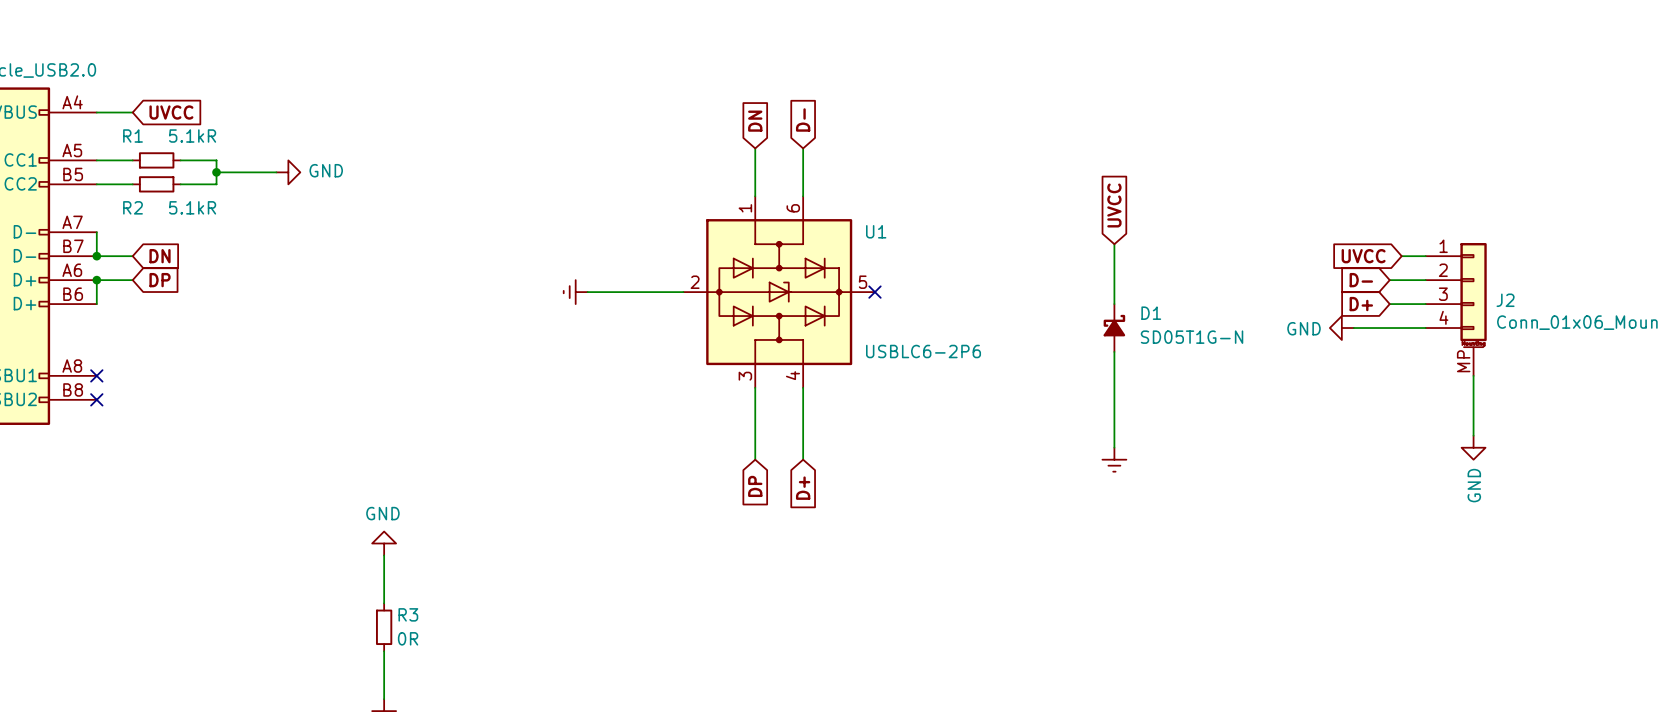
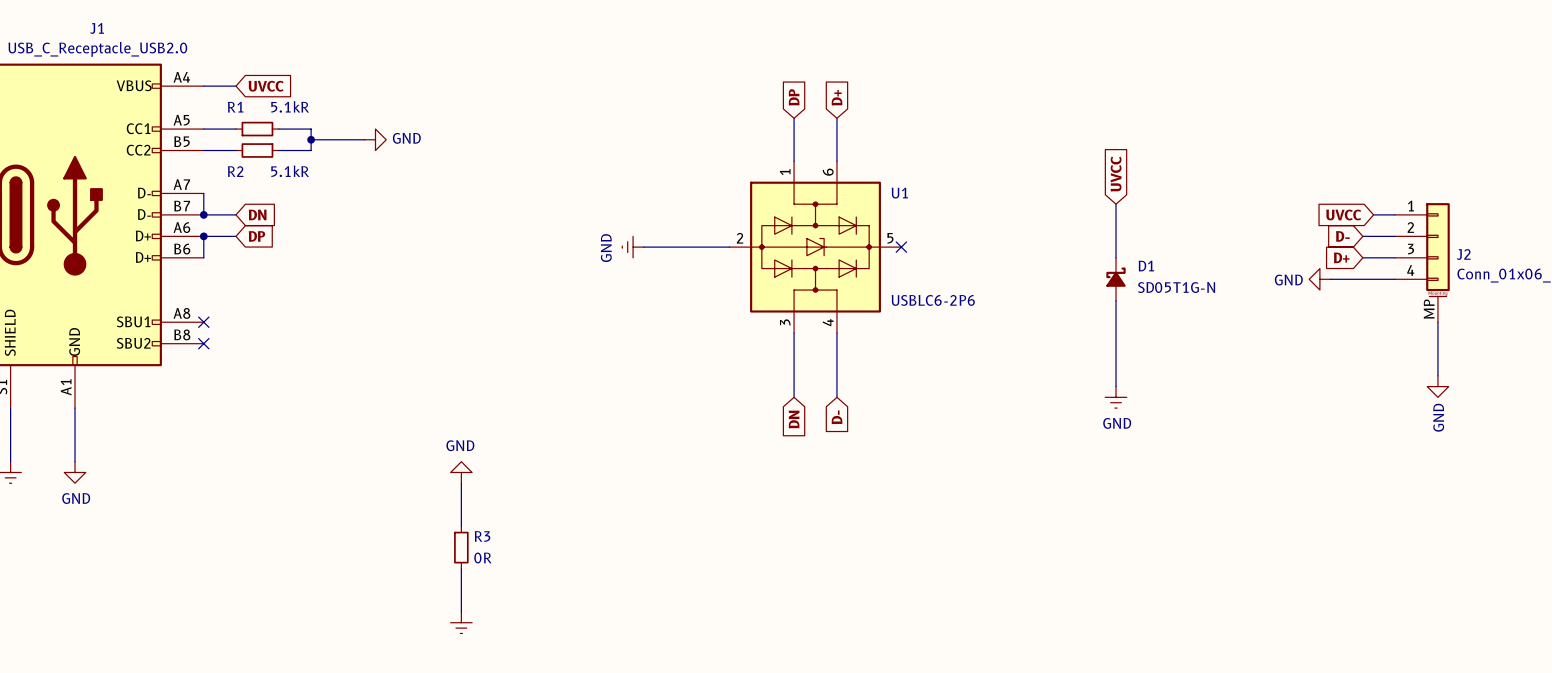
global label: D- (803, 119) -> D+ (837, 97)
global label: DN (755, 121) -> DP (794, 97)
power symbol text: none -> GND (606, 248)
global label: DP (755, 486) -> DN (794, 419)
global label: D+ (803, 488) -> D- (837, 417)
power symbol text: none -> GND (1117, 423)

